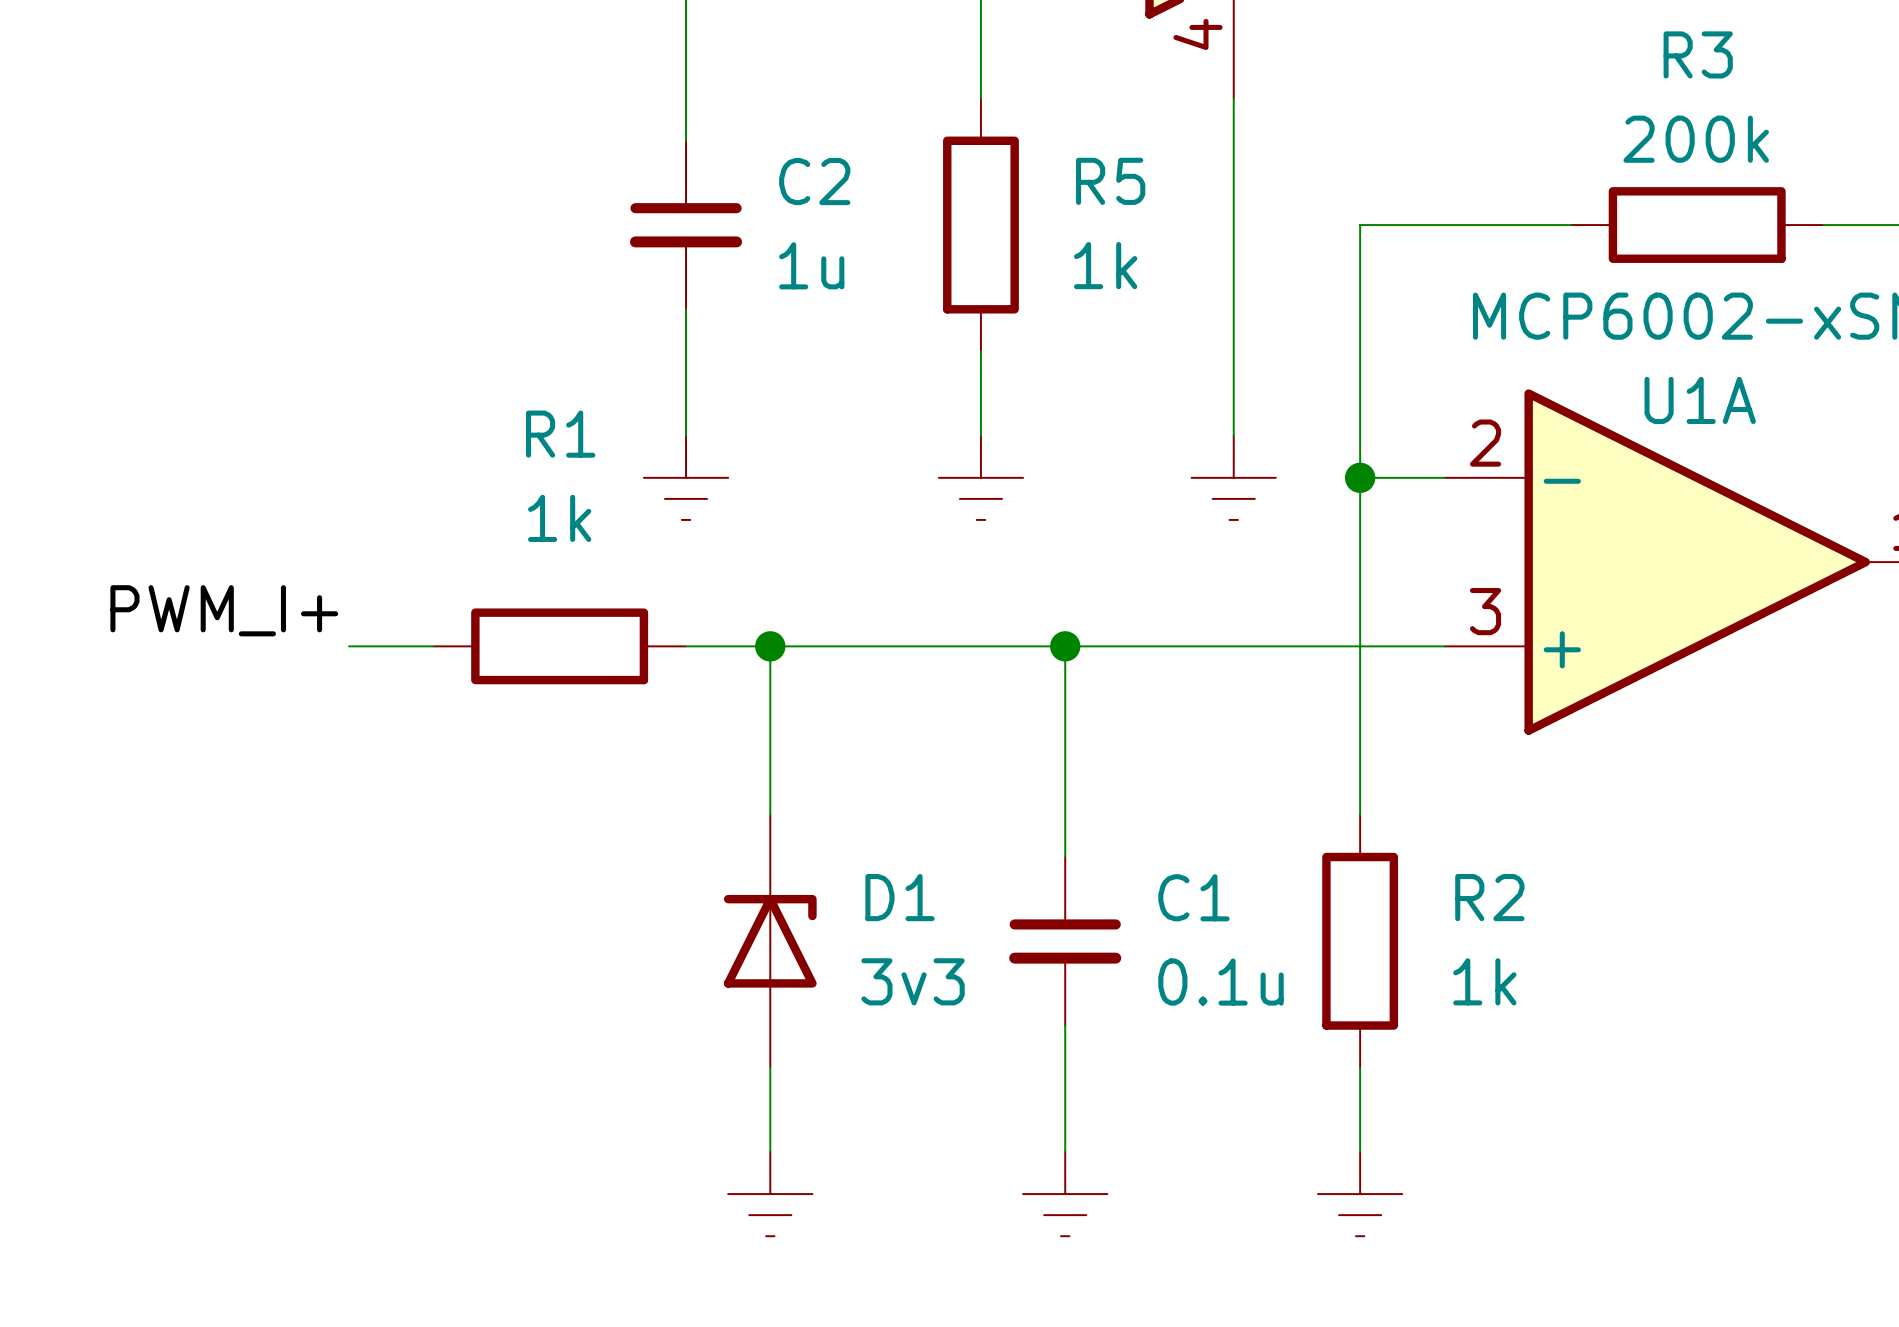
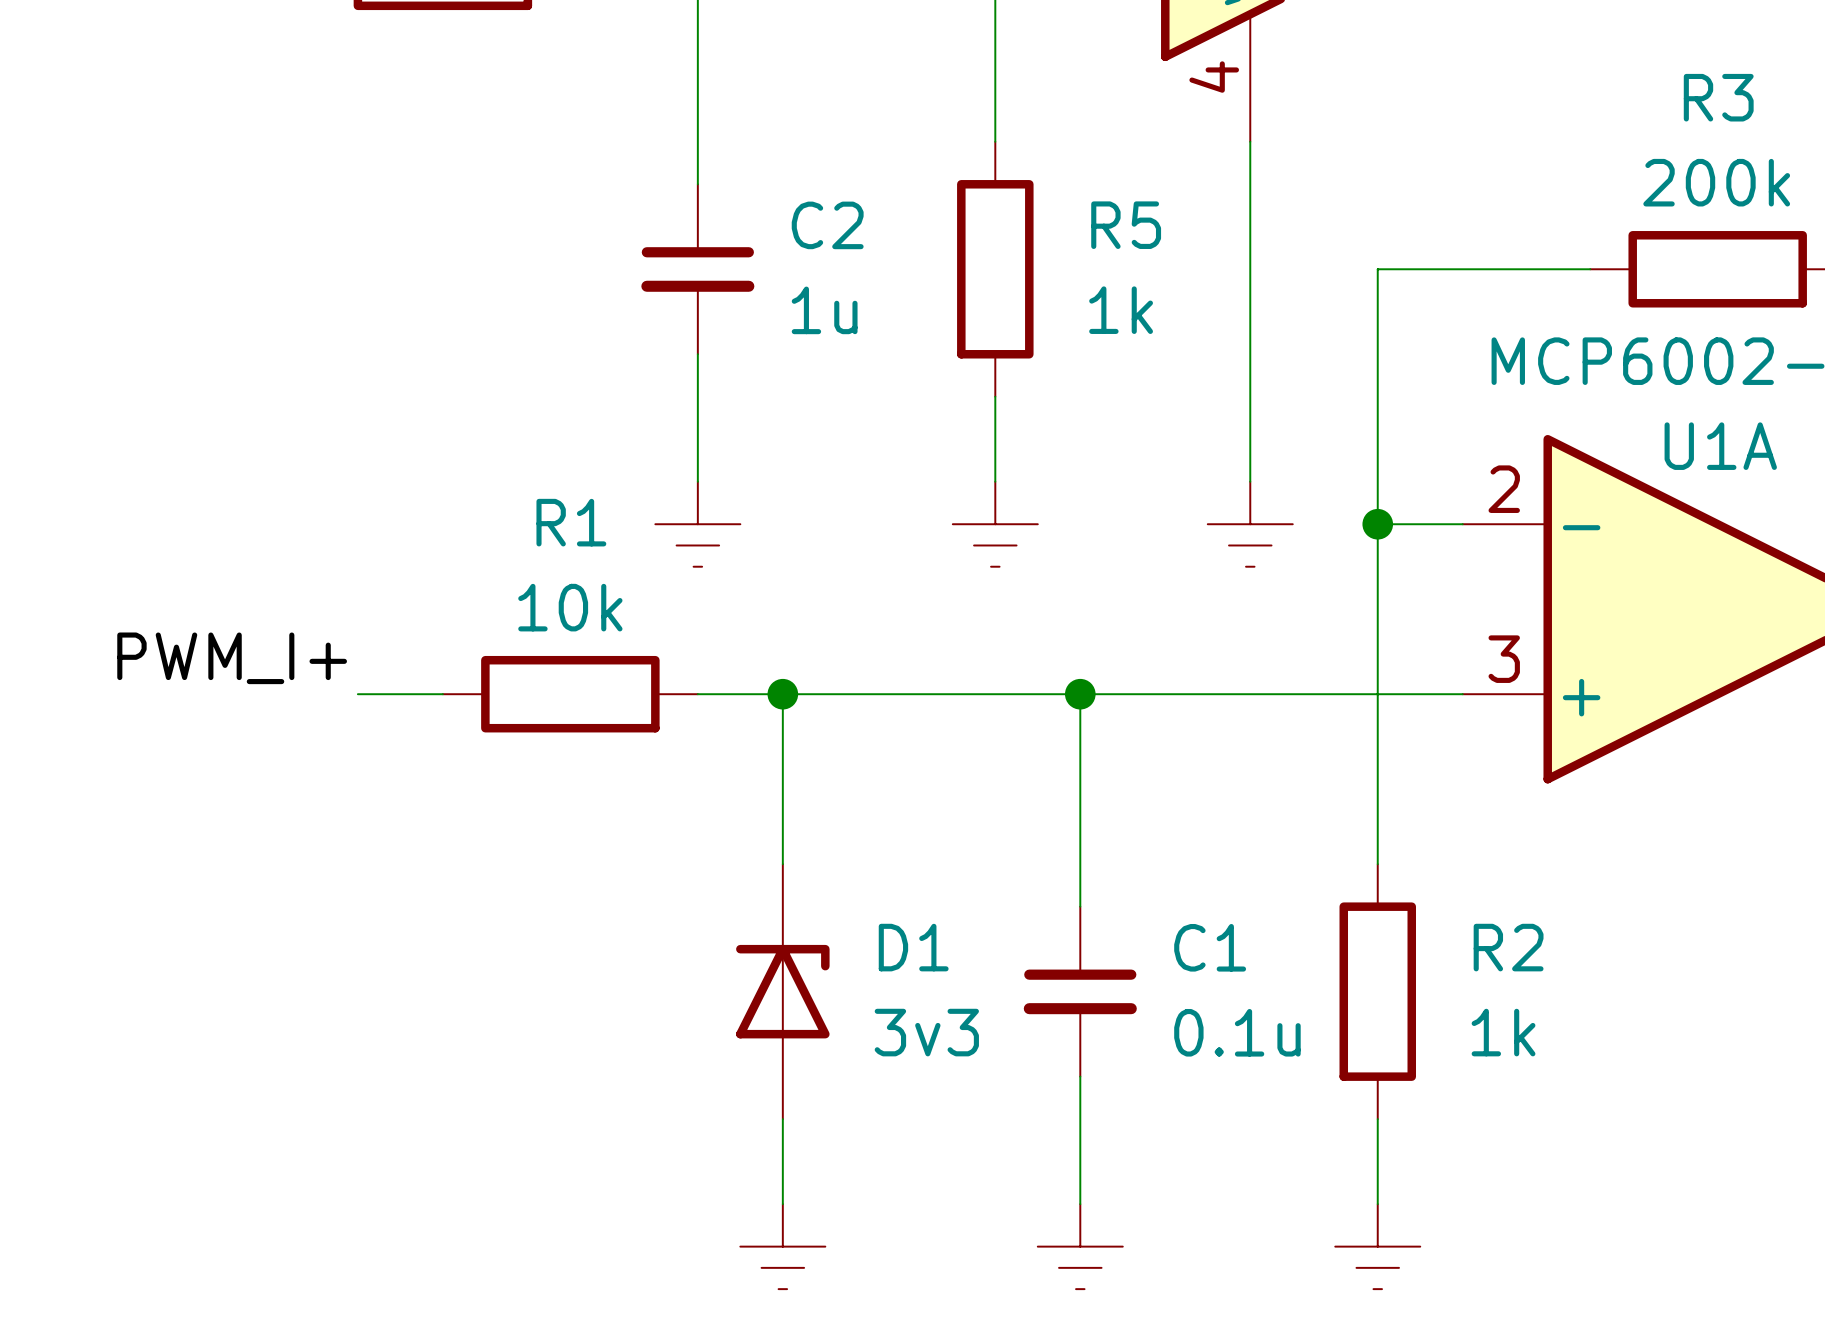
R1 name position: R1 (560, 434) -> R1 (571, 522)
R1 value: 1k (559, 518) -> 10k (570, 607)

